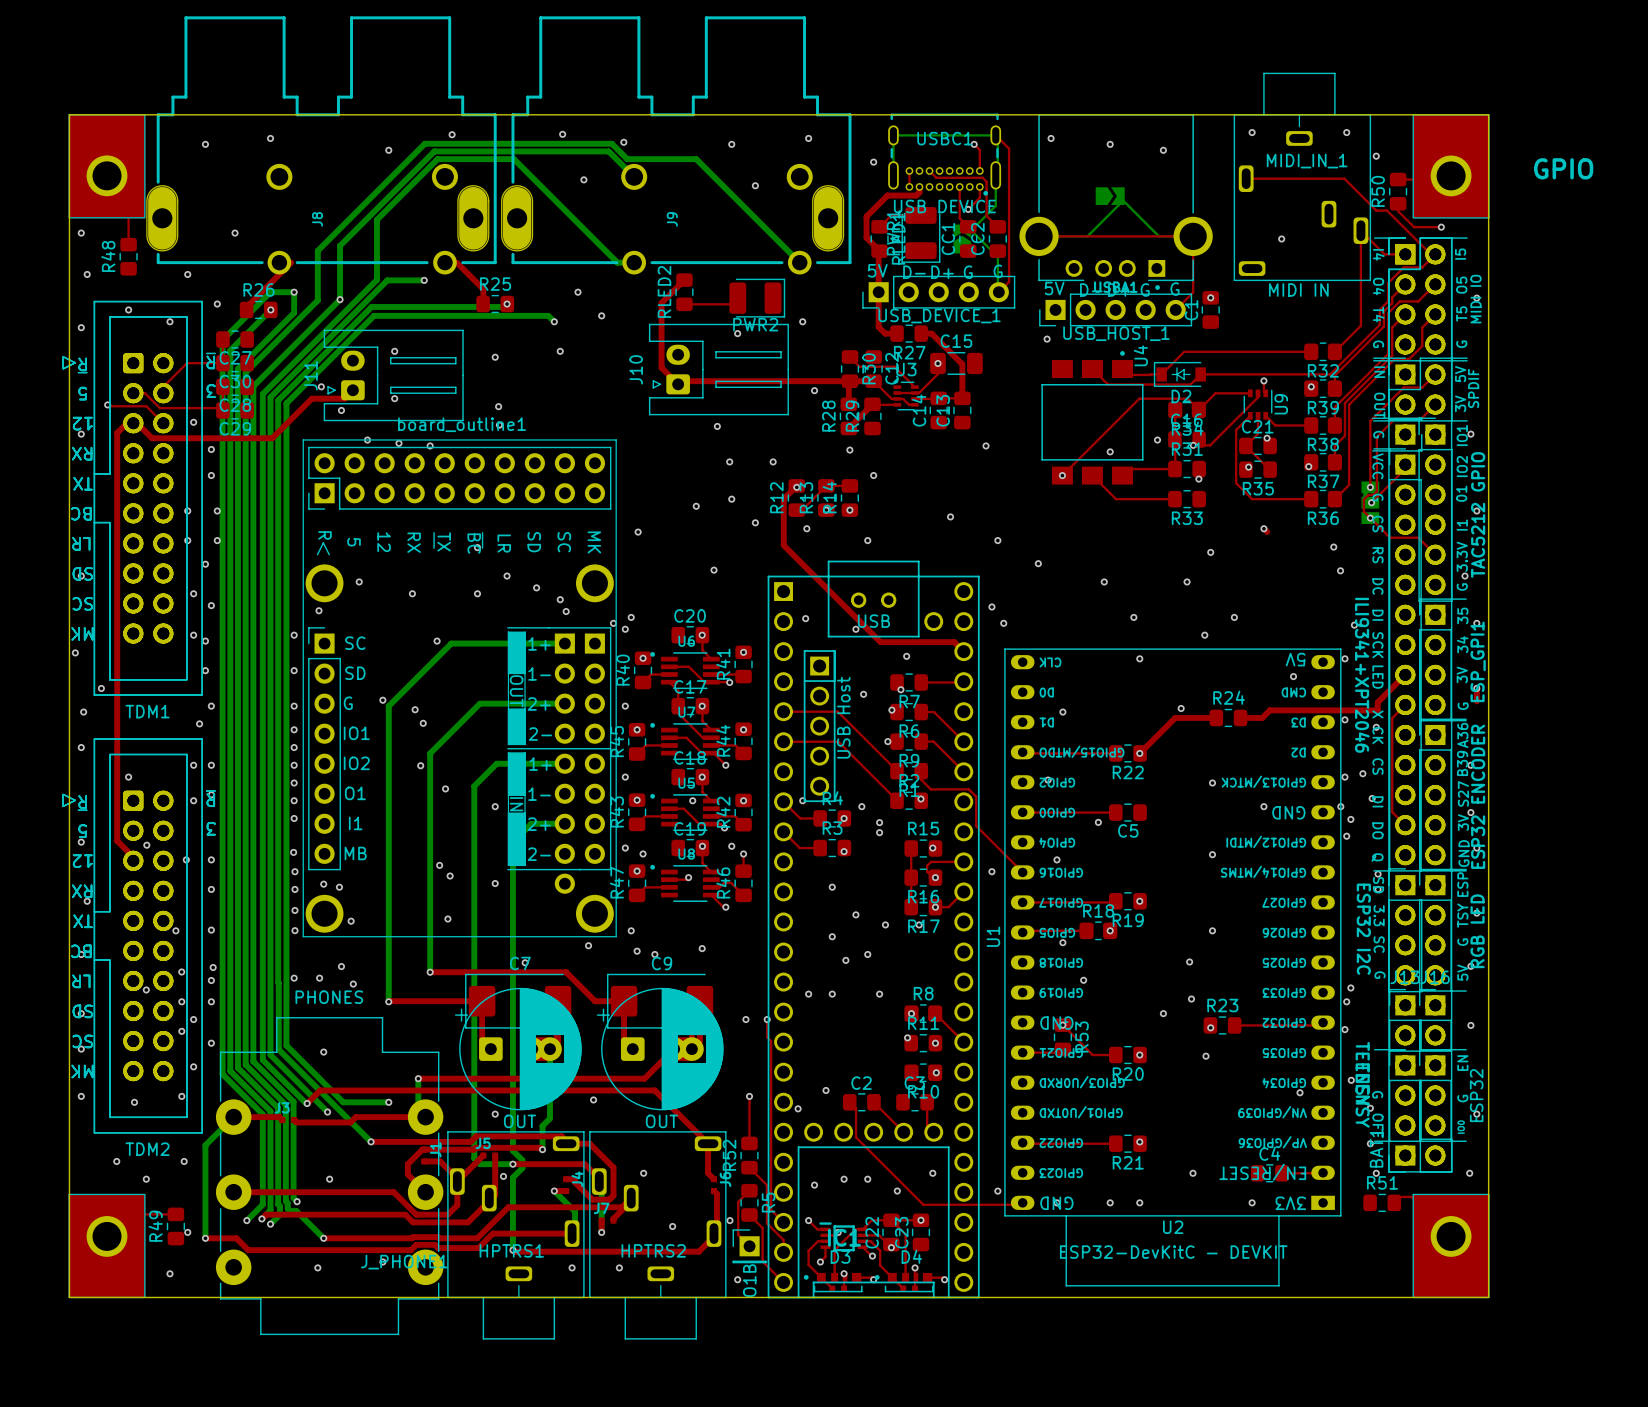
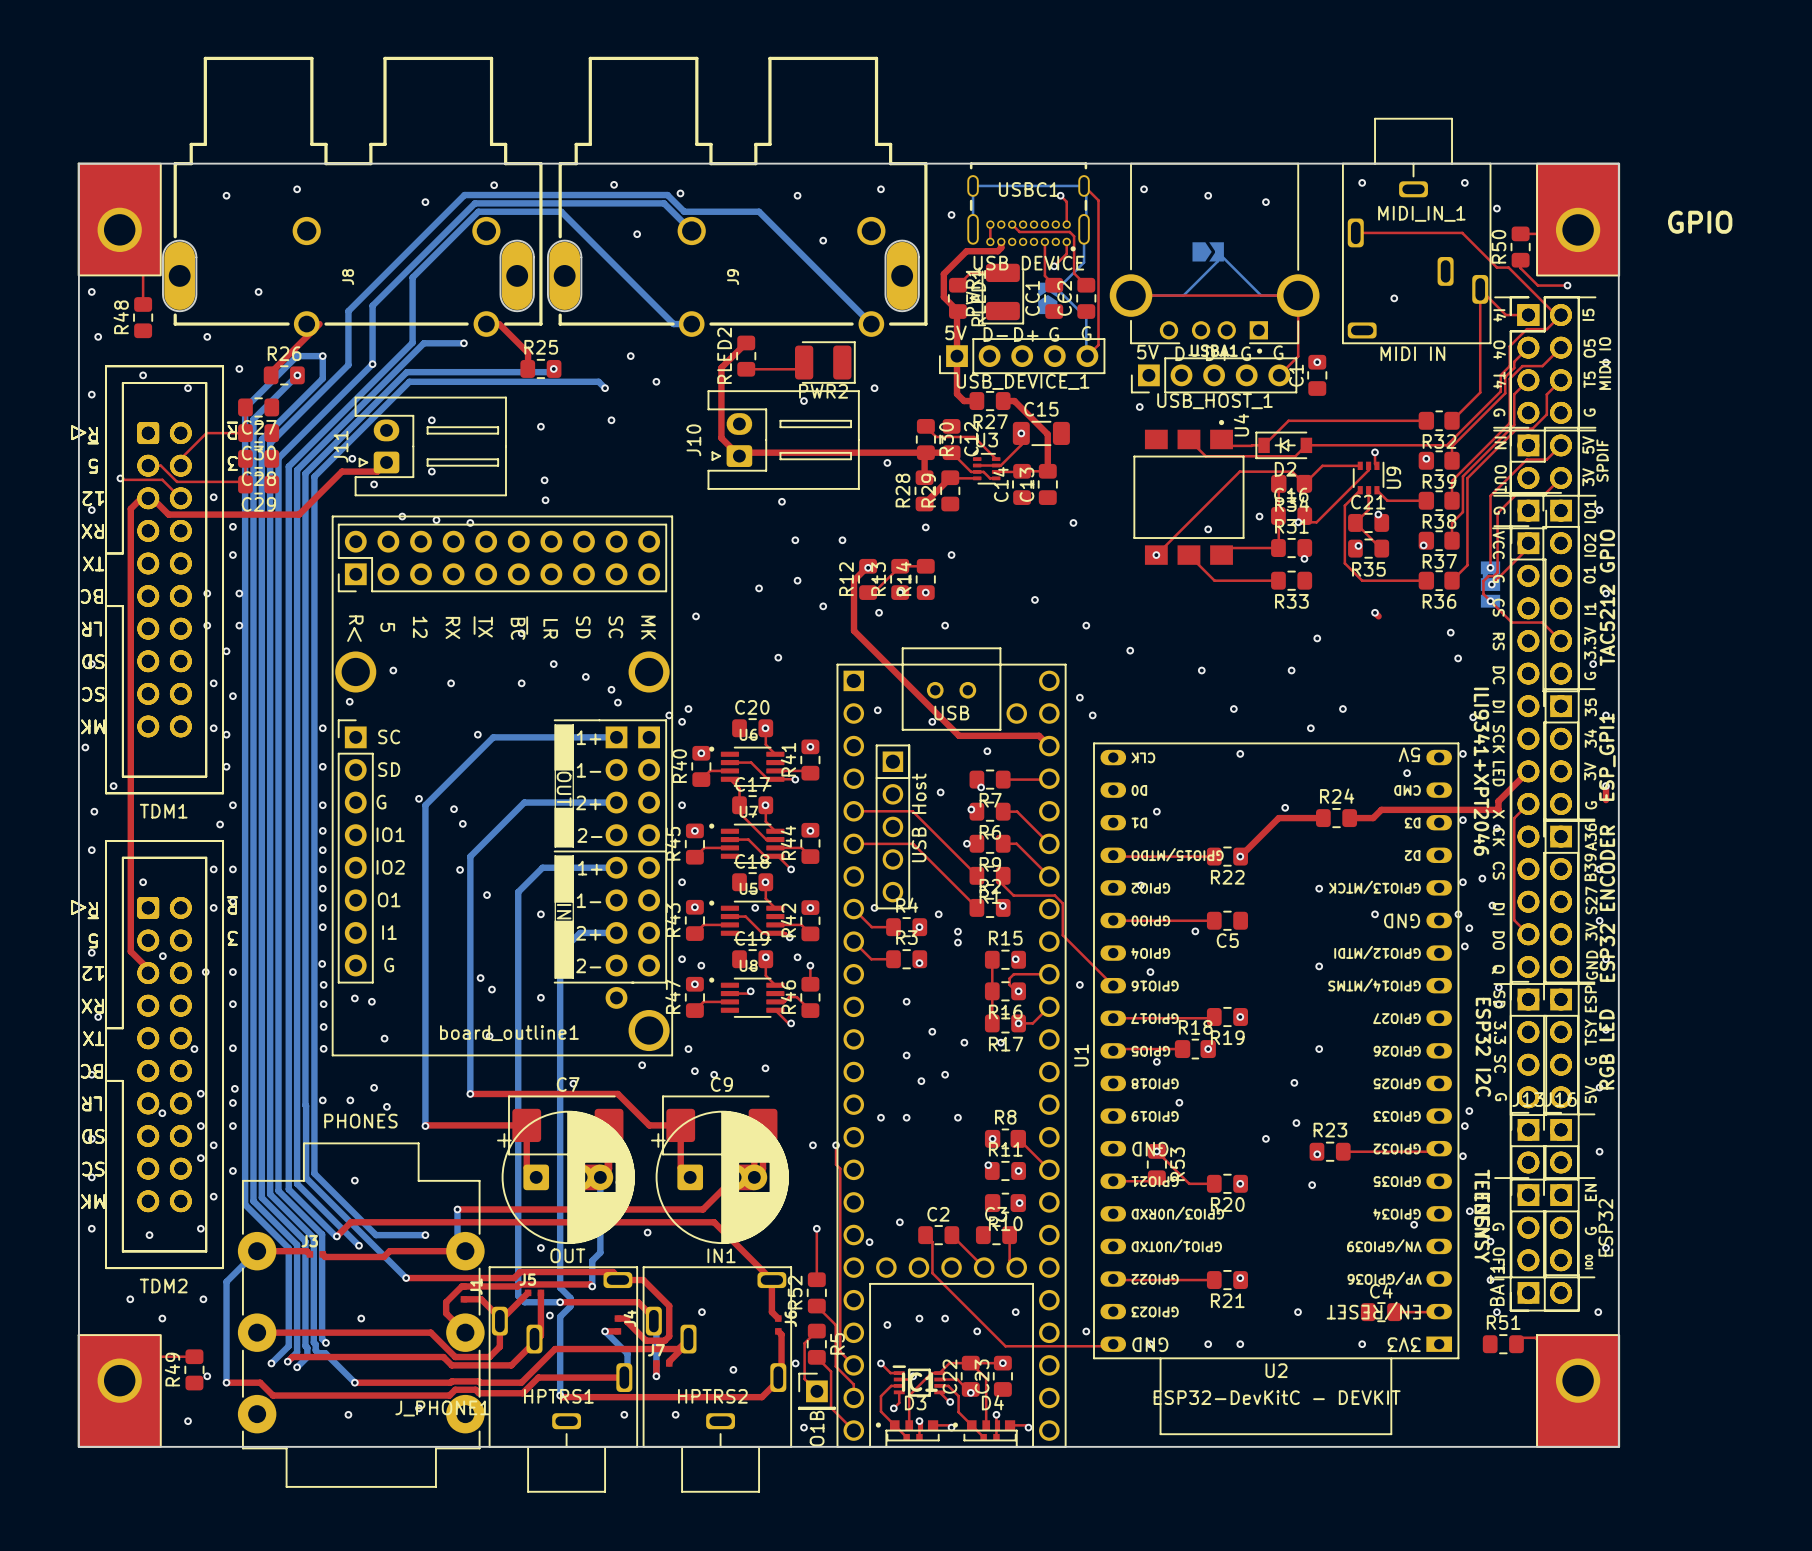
board_outline1 name position: board_outline1 (462, 424) -> board_outline1 (509, 1033)
board_outline1 footprint: [302, 439, 617, 937] -> [332, 516, 673, 1056]
HPTRS2 text: OUT (661, 1121) -> IN1 (721, 1255)

